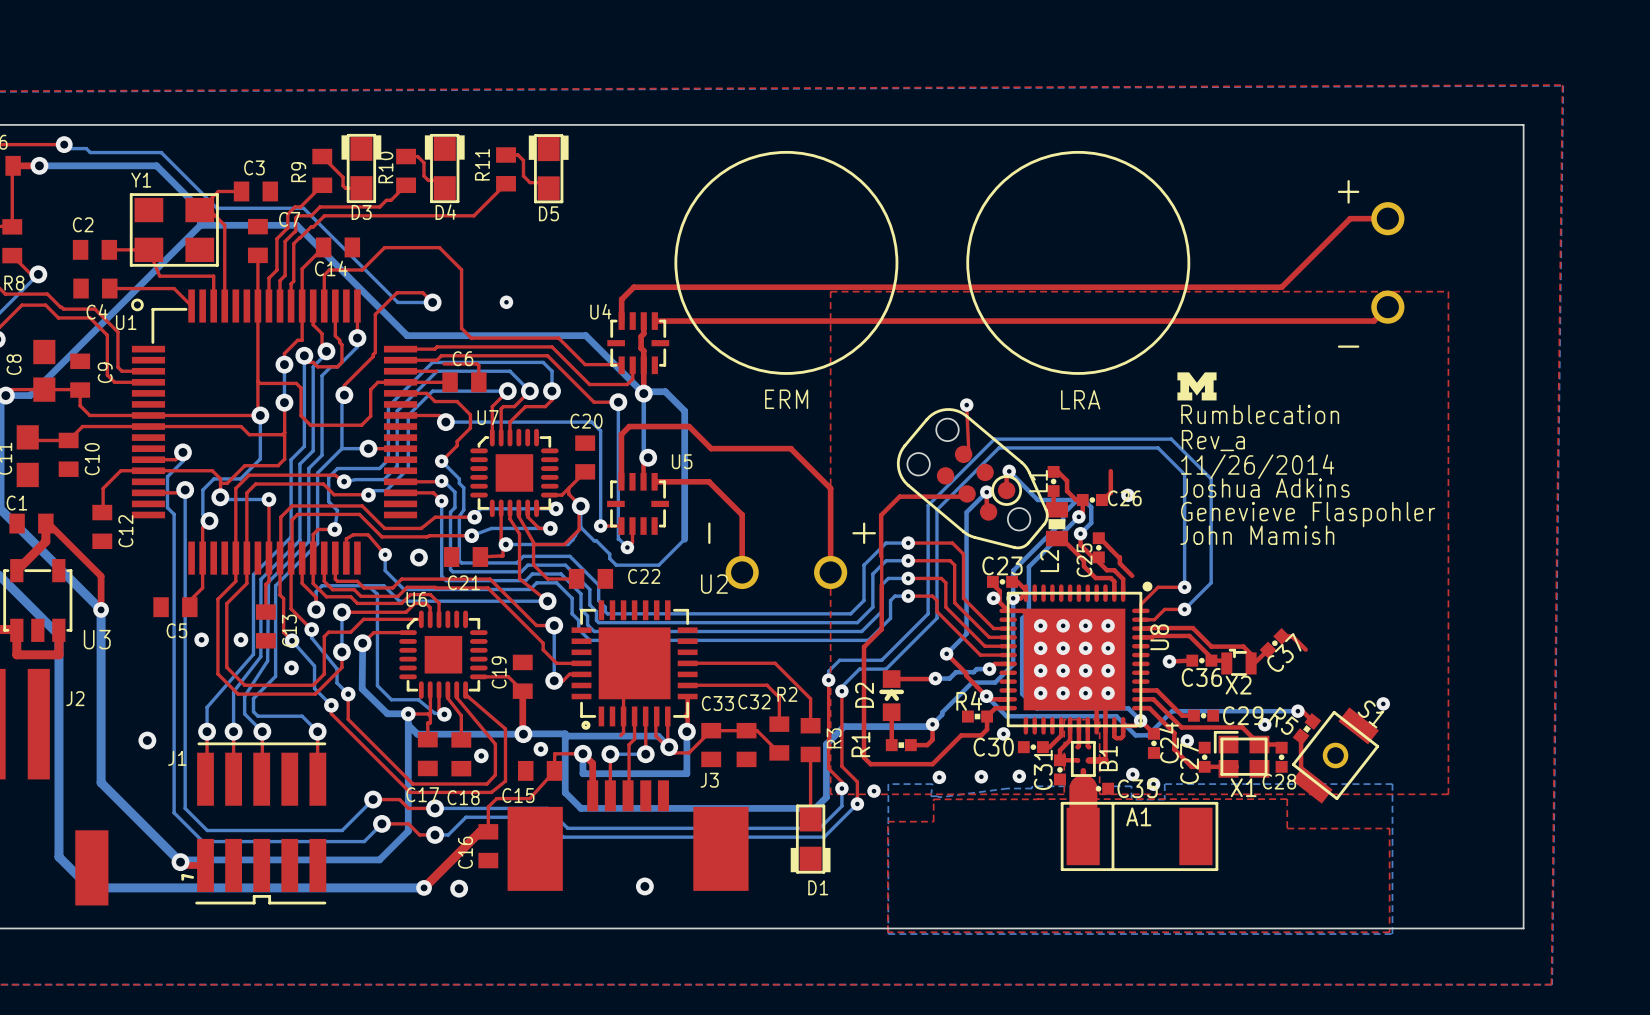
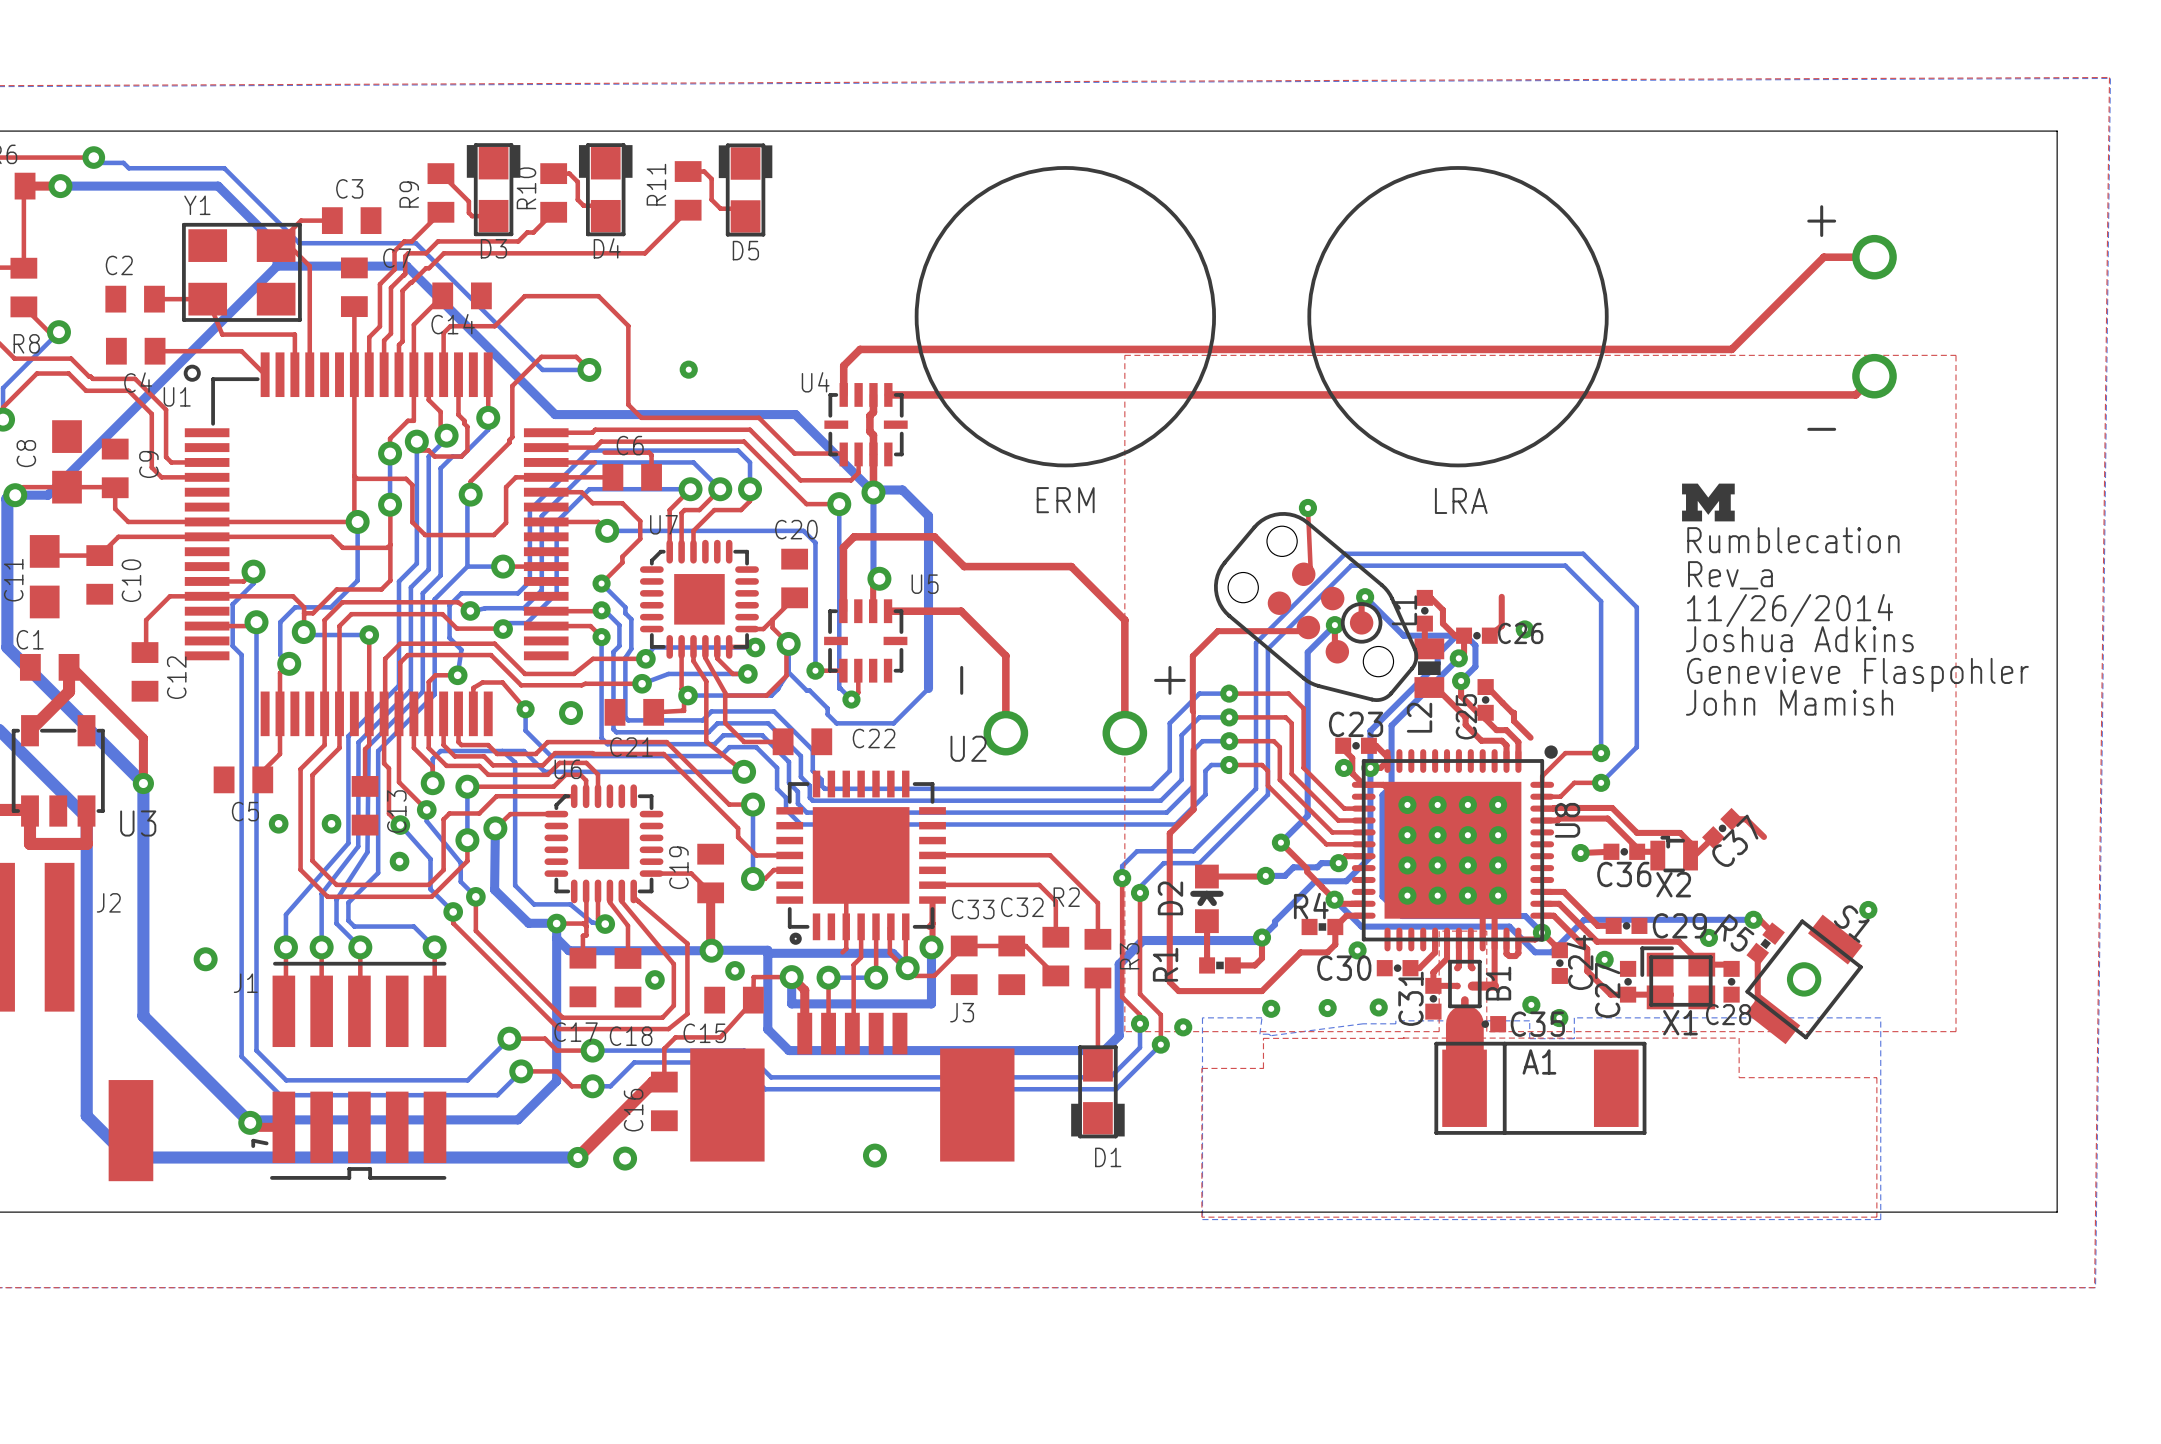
drawing position: (1196, 386) -> (1708, 502)
text position: Rumblecation (1260, 414) -> Rumblecation (1793, 540)
text position: Rev_a (1213, 440) -> Rev_a (1730, 575)
text position: 11/26/2014 (1257, 466) -> 11/26/2014 (1790, 610)
text position: Joshua Adkins (1264, 488) -> Joshua Adkins (1799, 639)
text position: Genevieve Flaspohler (1308, 514) -> Genevieve Flaspohler (1857, 674)
text position: John Mamish (1257, 535) -> John Mamish (1789, 702)

